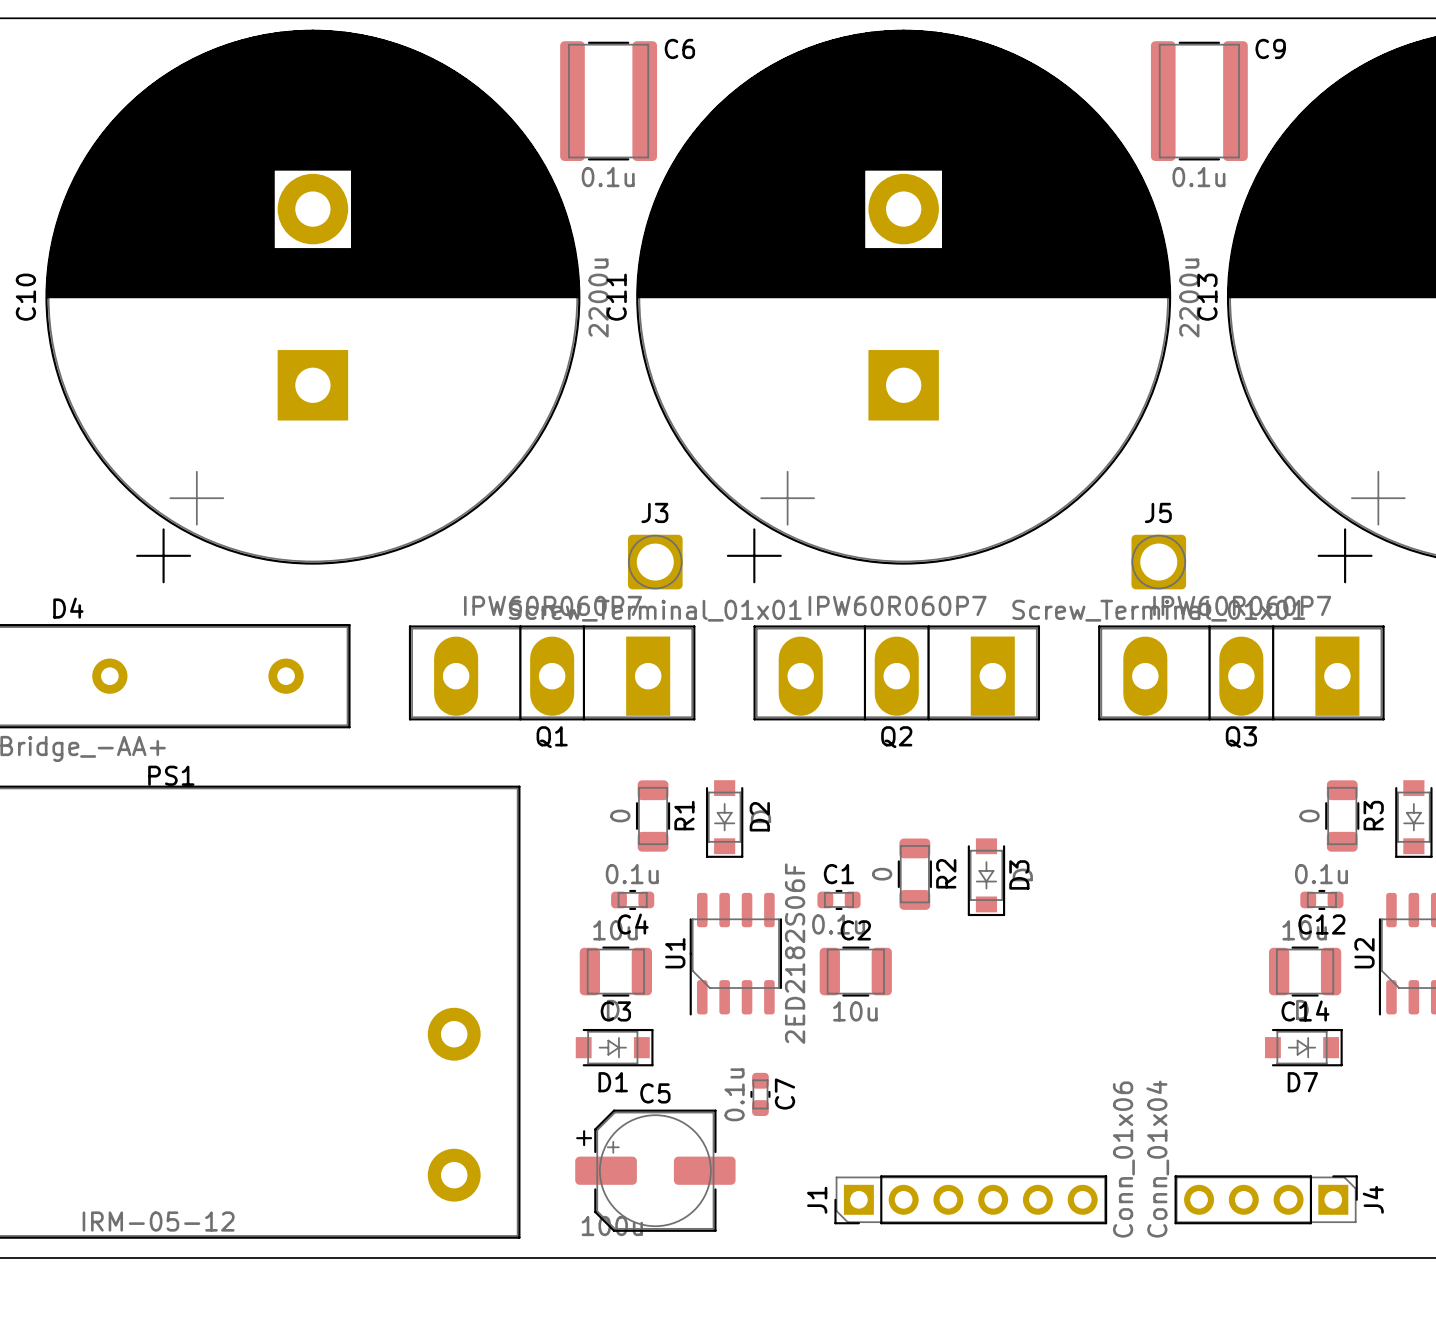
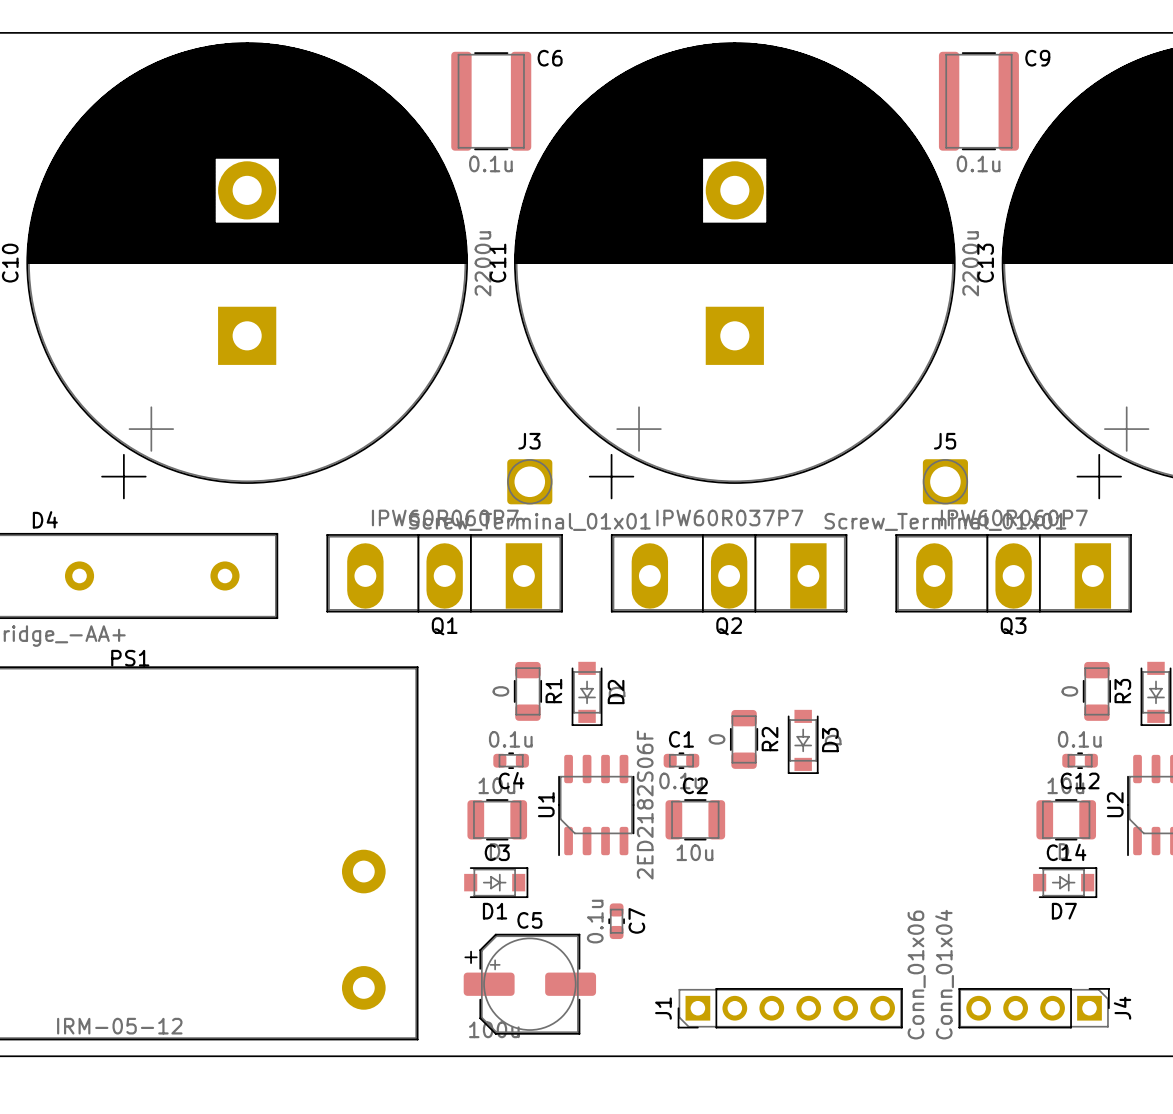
Q2 value: IPW60R060P7 (897, 605) -> IPW60R037P7 (729, 517)

